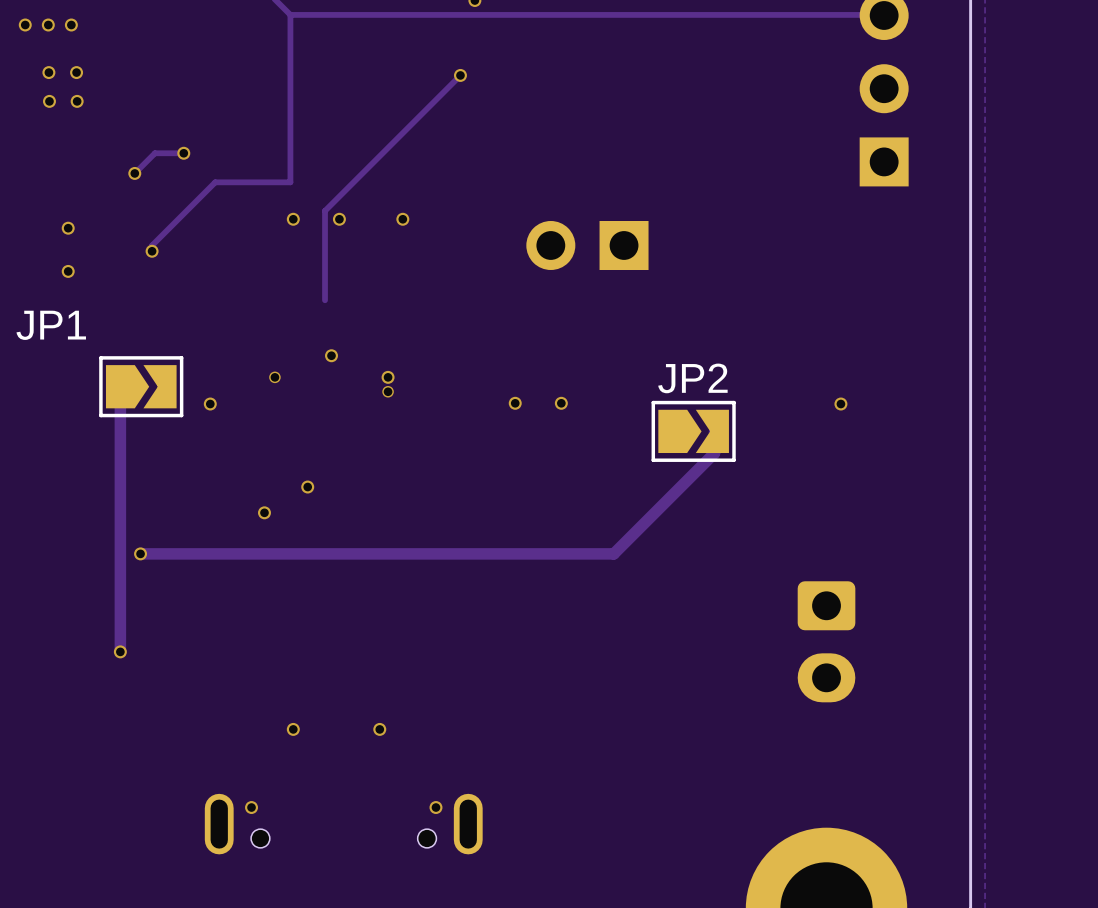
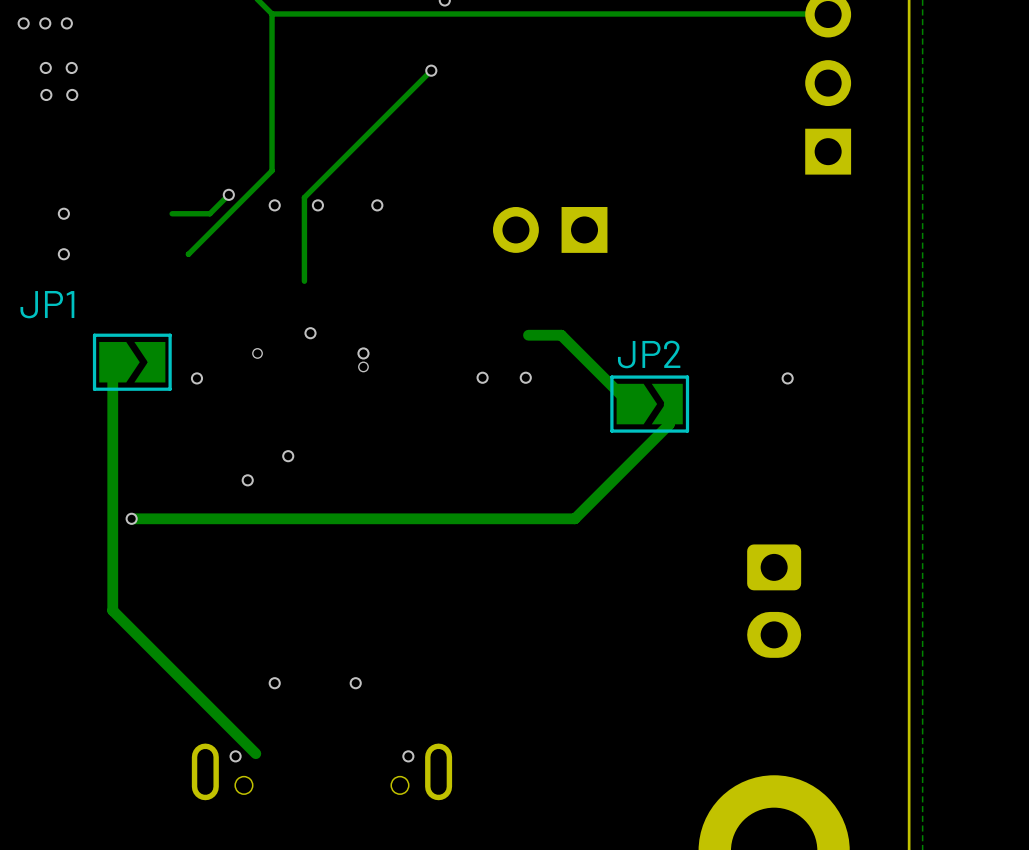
track: (183, 153) (154, 153) (134, 173) -> none
via: (183, 153) -> none
via: (134, 173) -> none
track: (290, 182) (215, 182) (152, 245) (152, 251) -> (272, 170) (188, 254)
track: none -> (228, 194) (209, 213) (172, 213)
via: none -> (228, 194)
via: (152, 251) -> none
track: none -> (528, 335) (561, 335) (630, 404)
track: none -> (112, 610) (255, 753)
via: (120, 651) -> none

